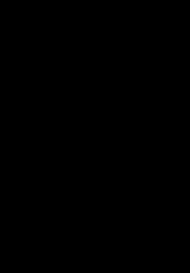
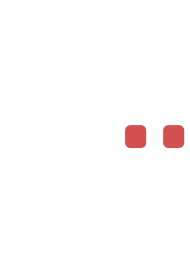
part: none -> (154, 136)

